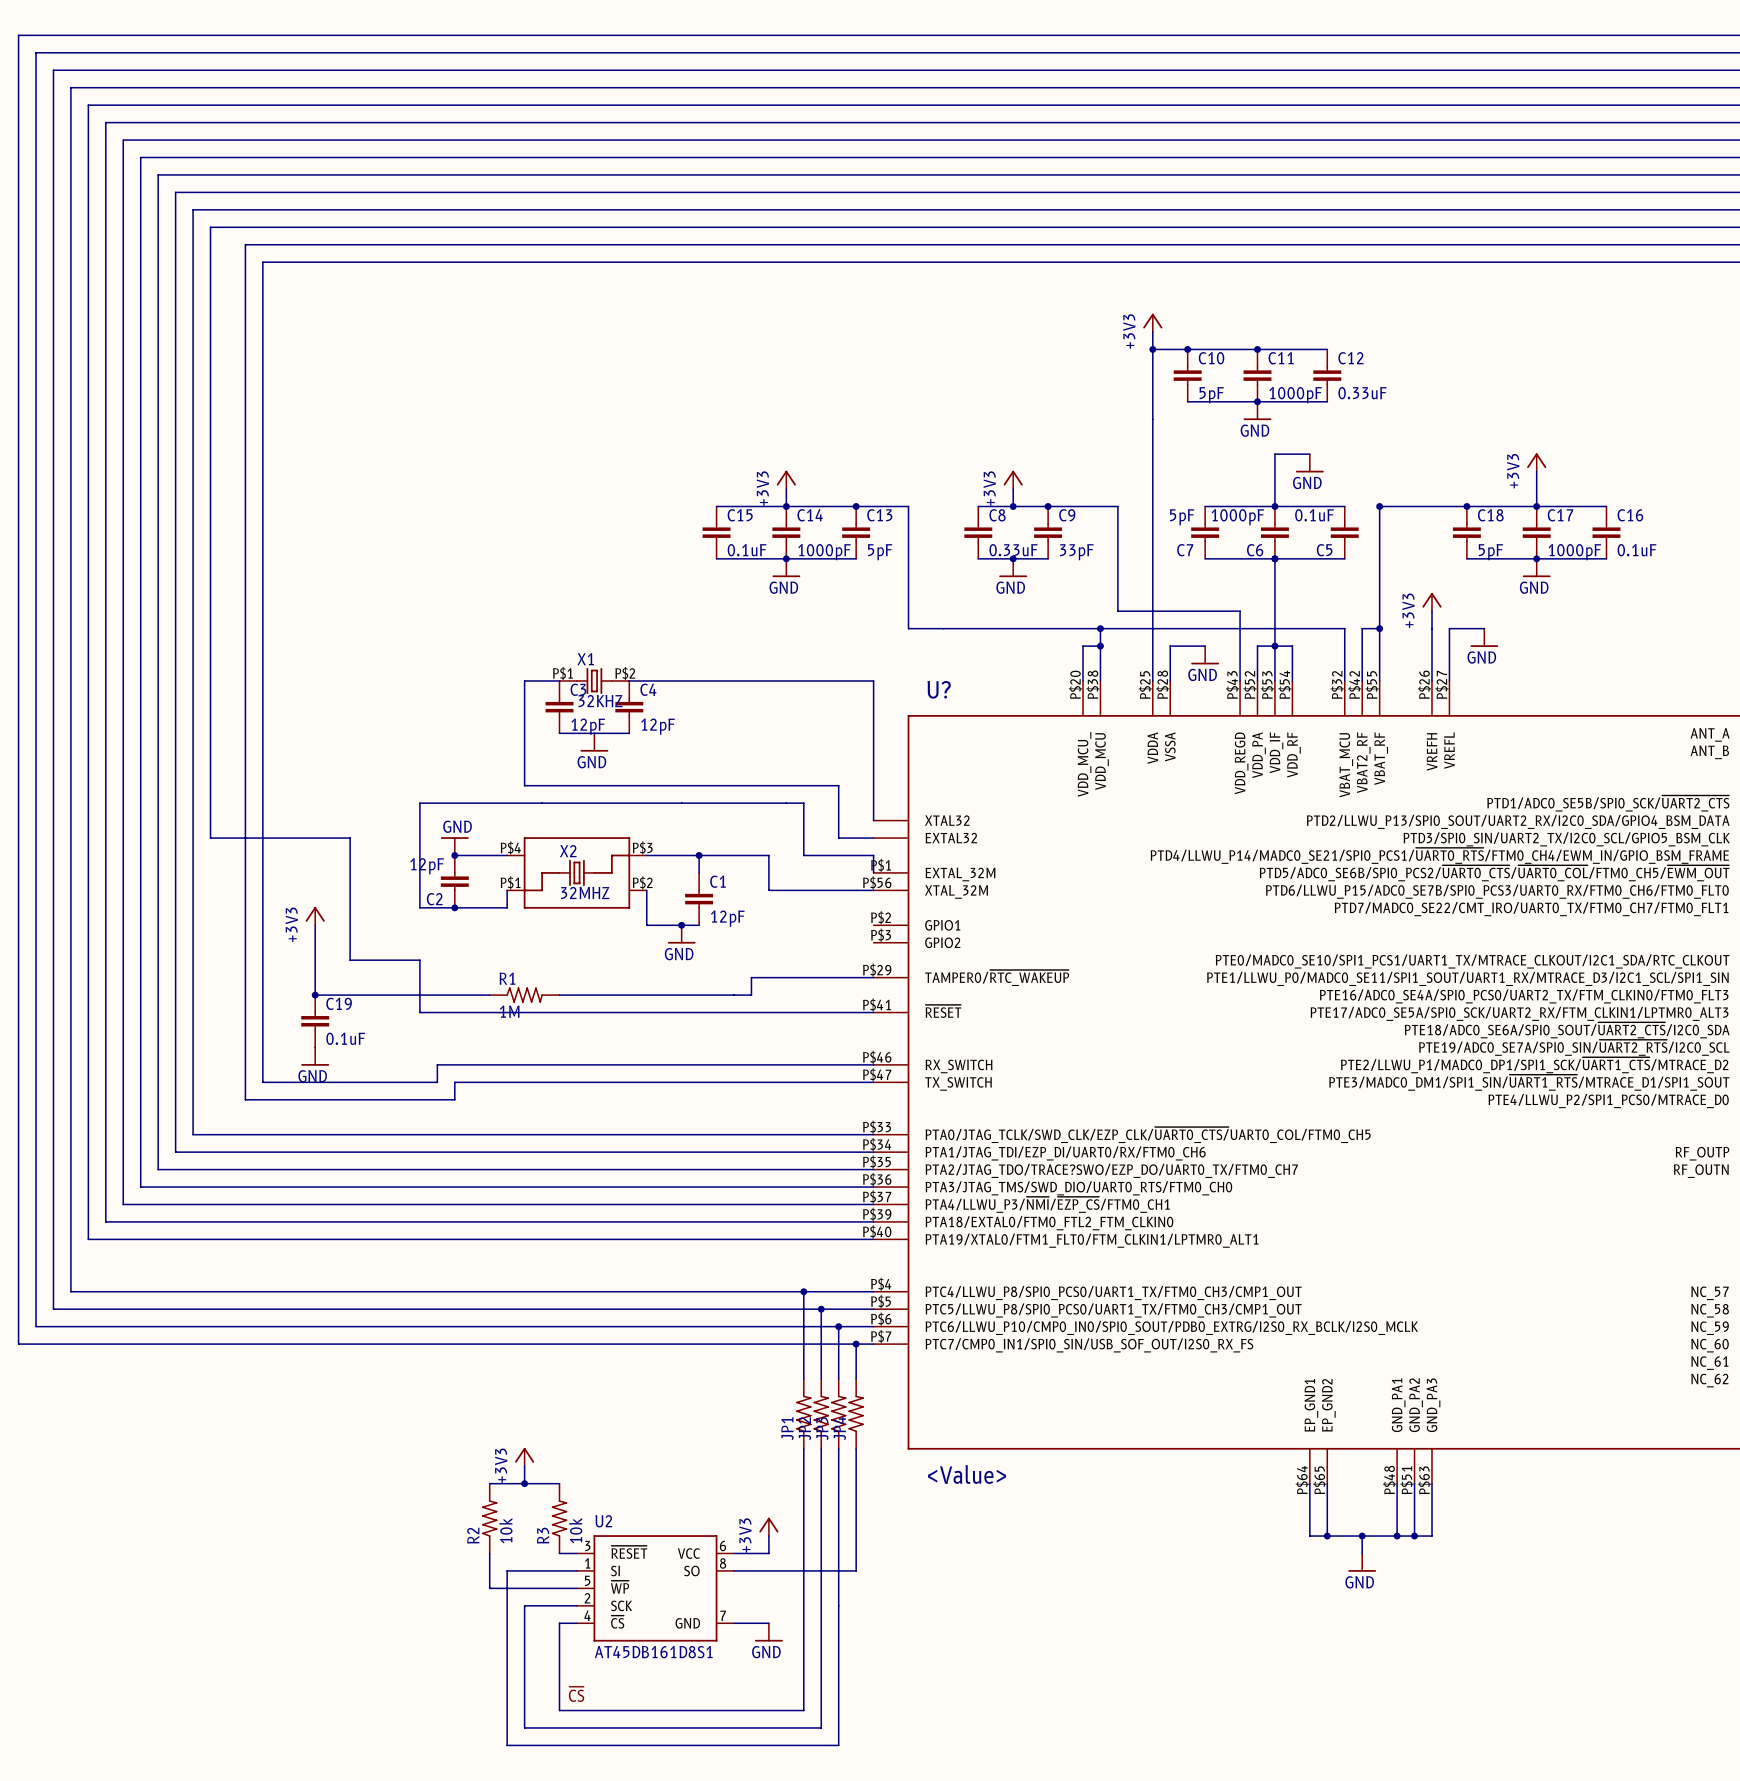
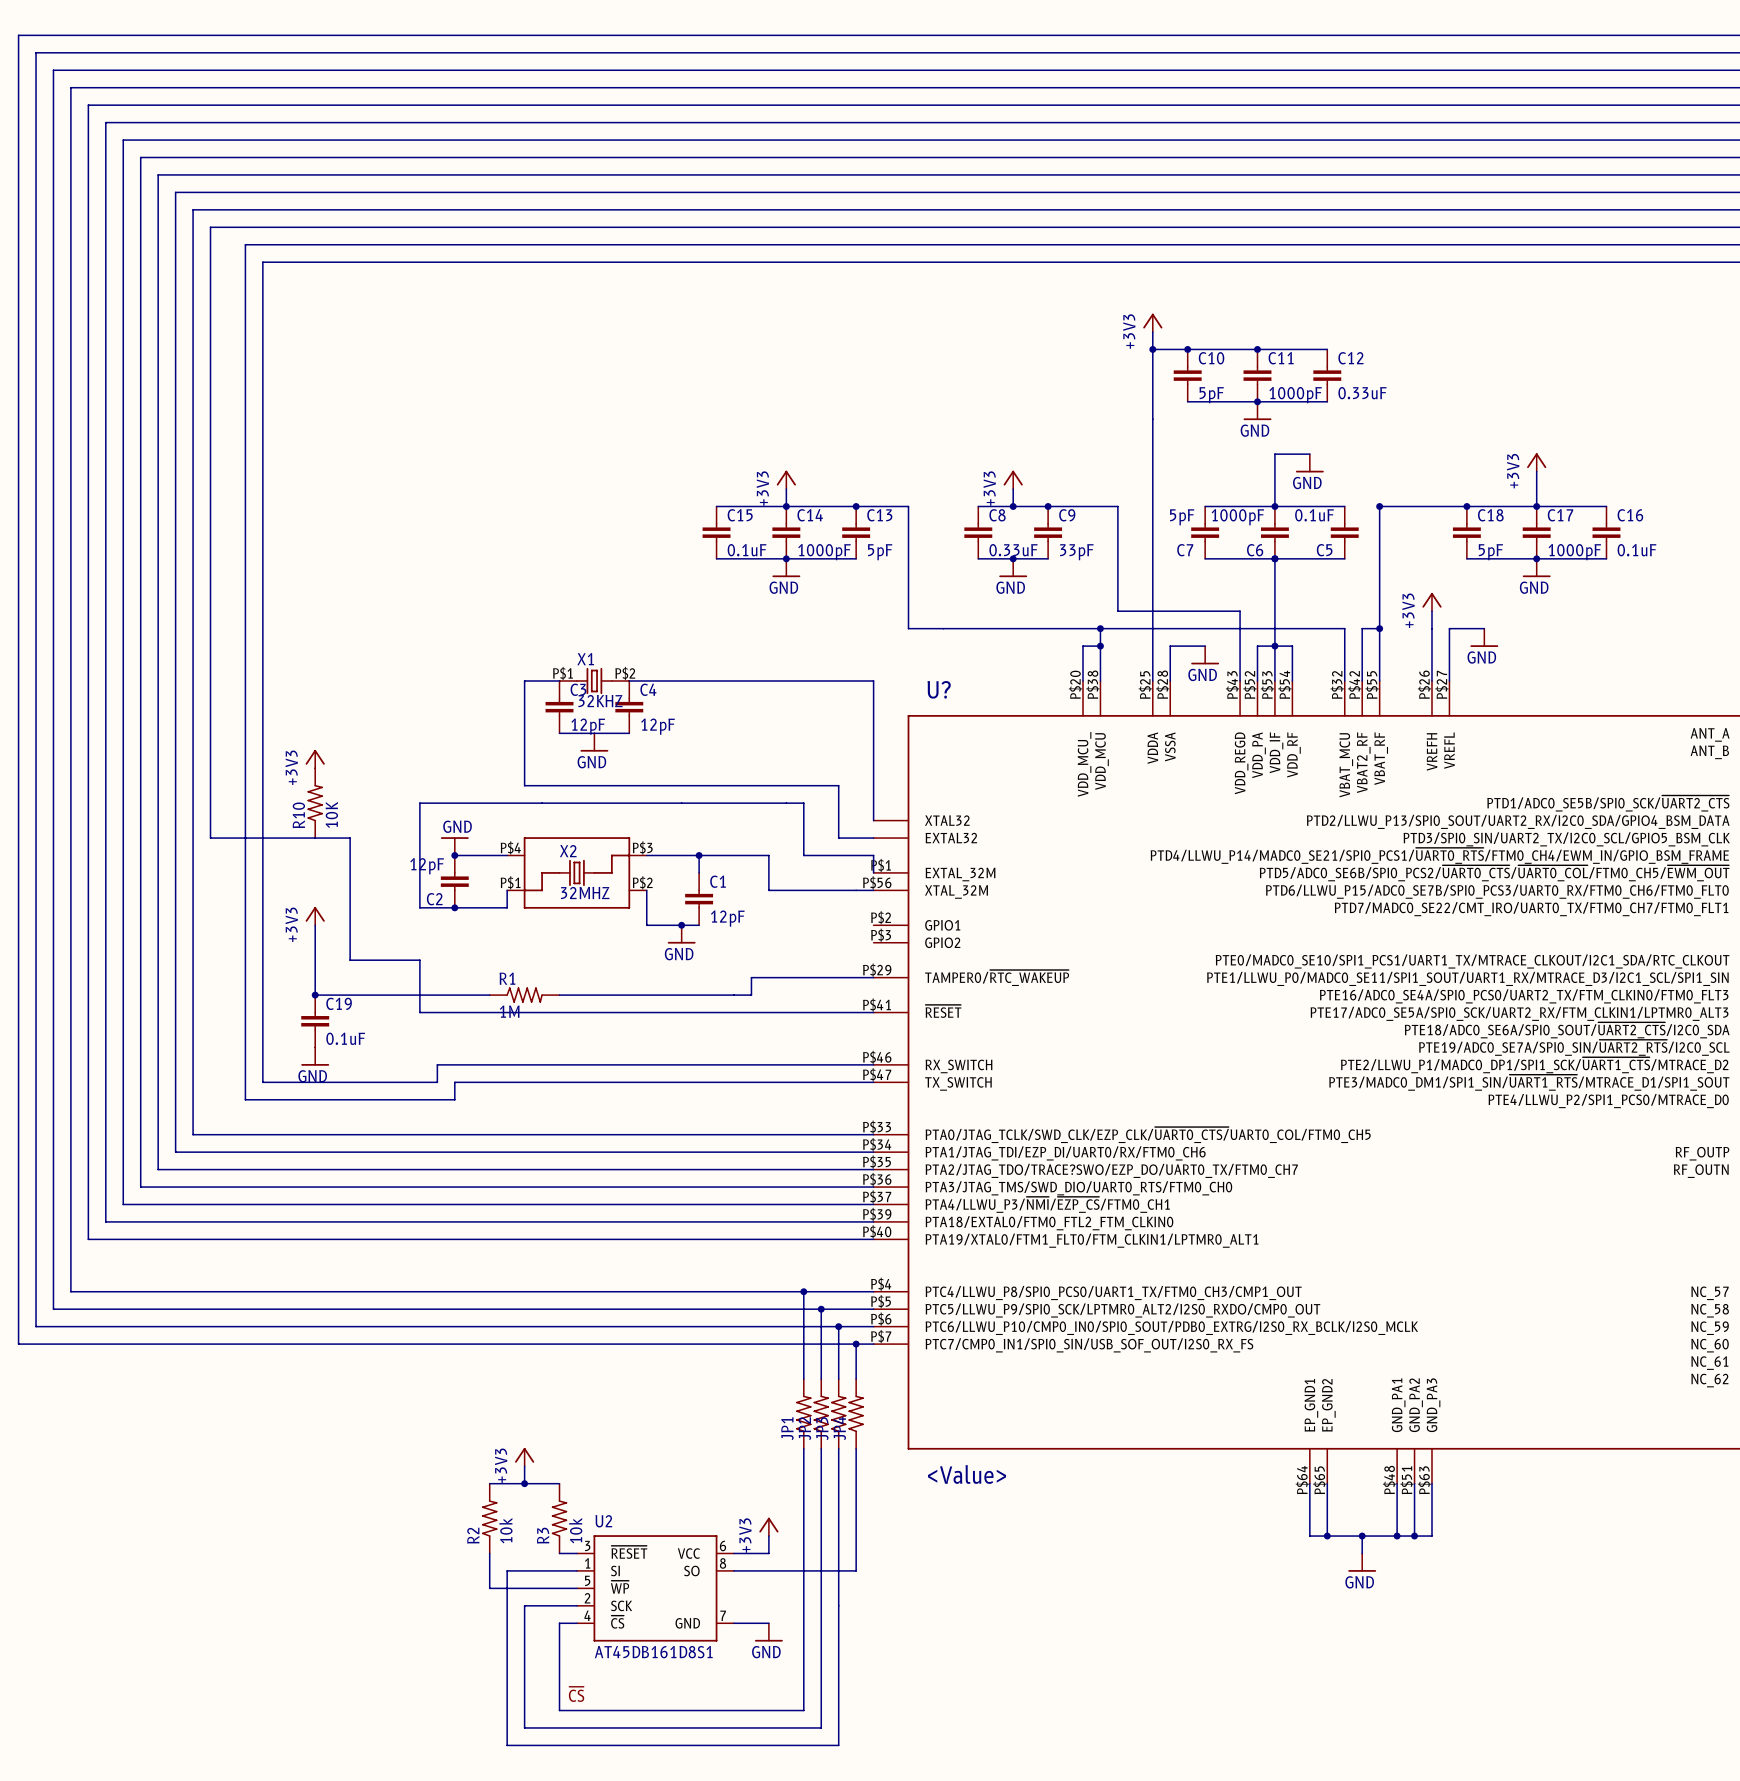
power symbol: none -> +3V3 (315, 759)
R10: none -> 10K (315, 803)
part pin name: PTC5/LLWU_P8/SPI0_PCS0/UART1_TX/FTM0_CH3/CMP1_OUT (1113, 1310) -> PTC5/LLWU_P9/SPI0_SCK/LPTMR0_ALT2/I2S0_RXDO/CMP0_OUT (1122, 1310)

